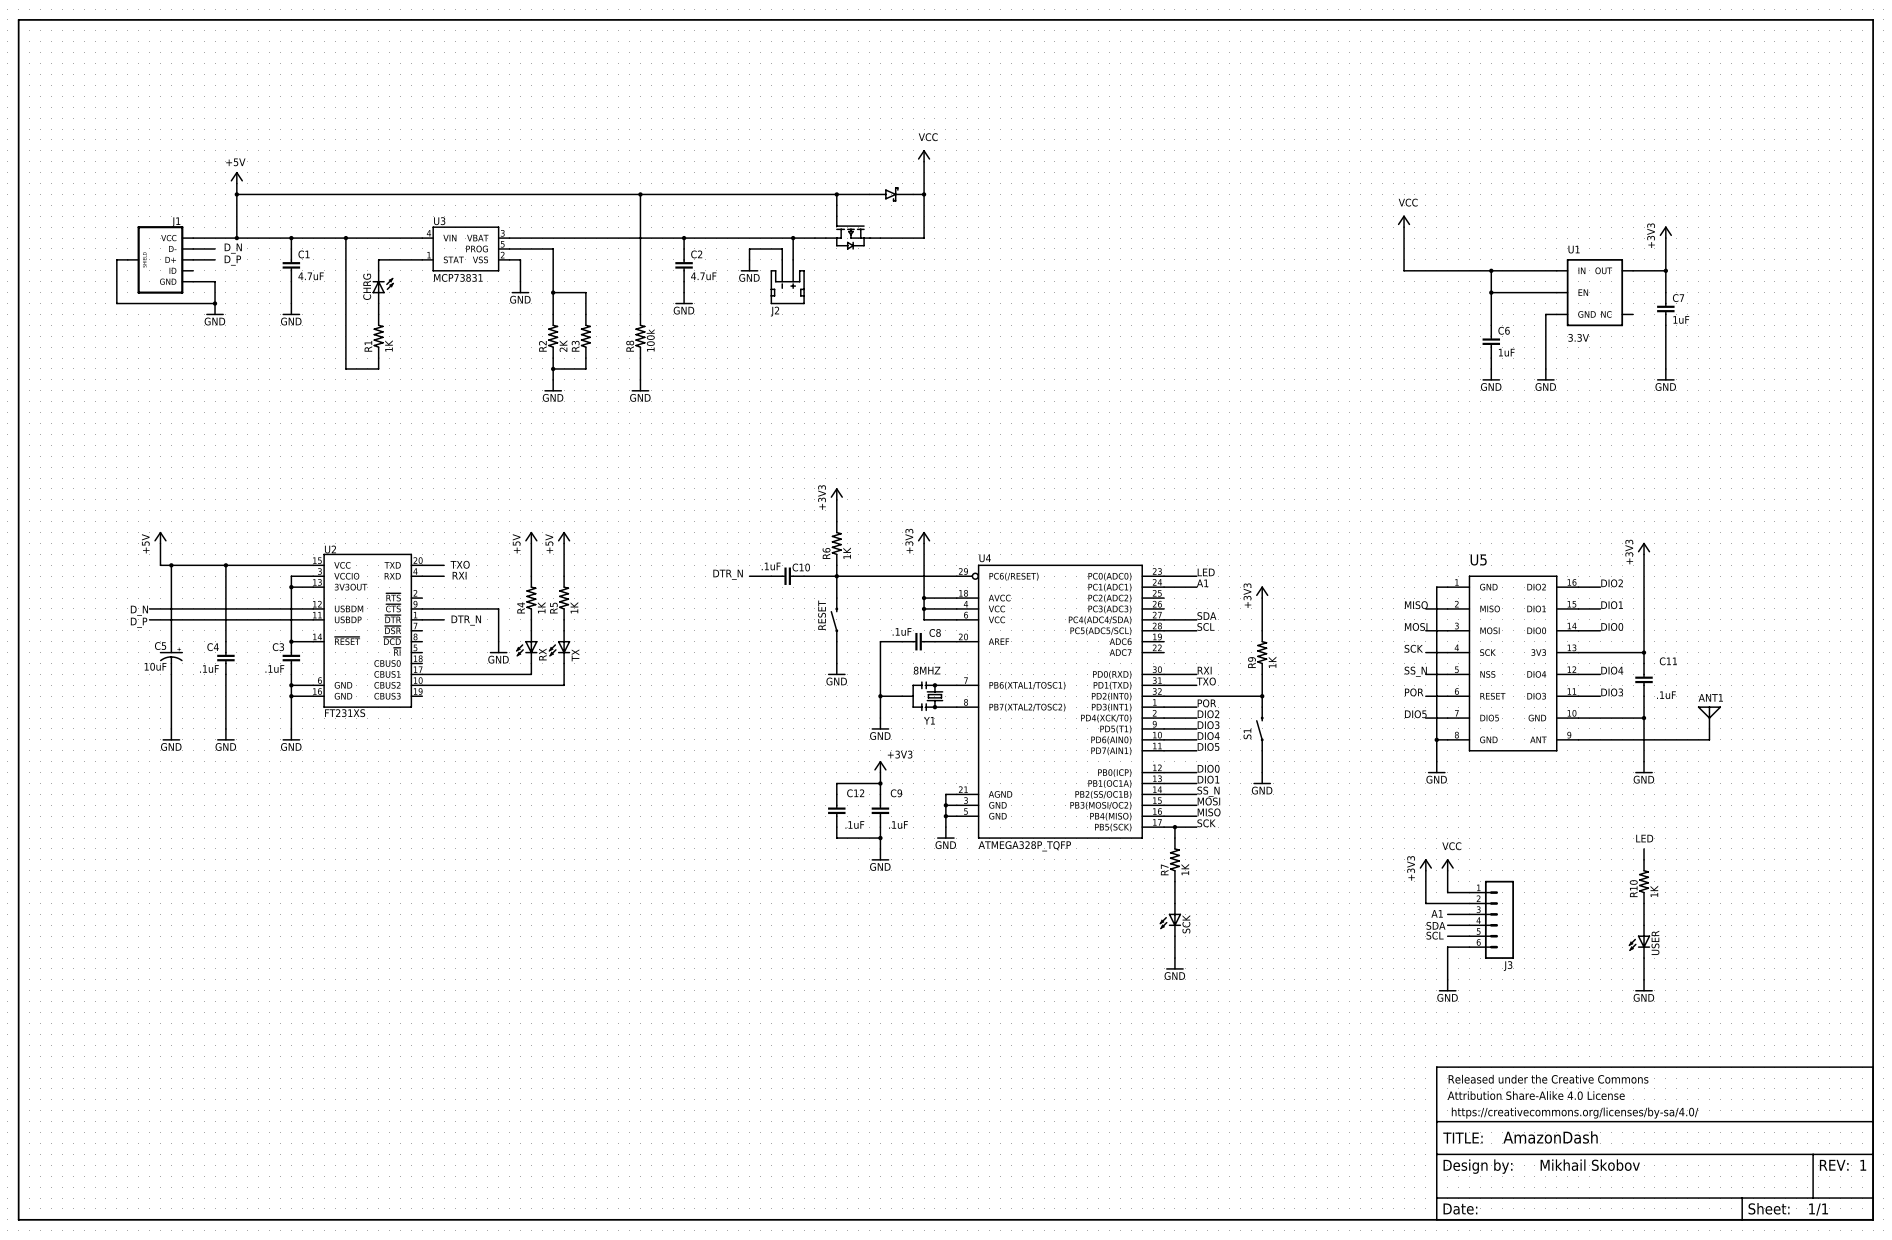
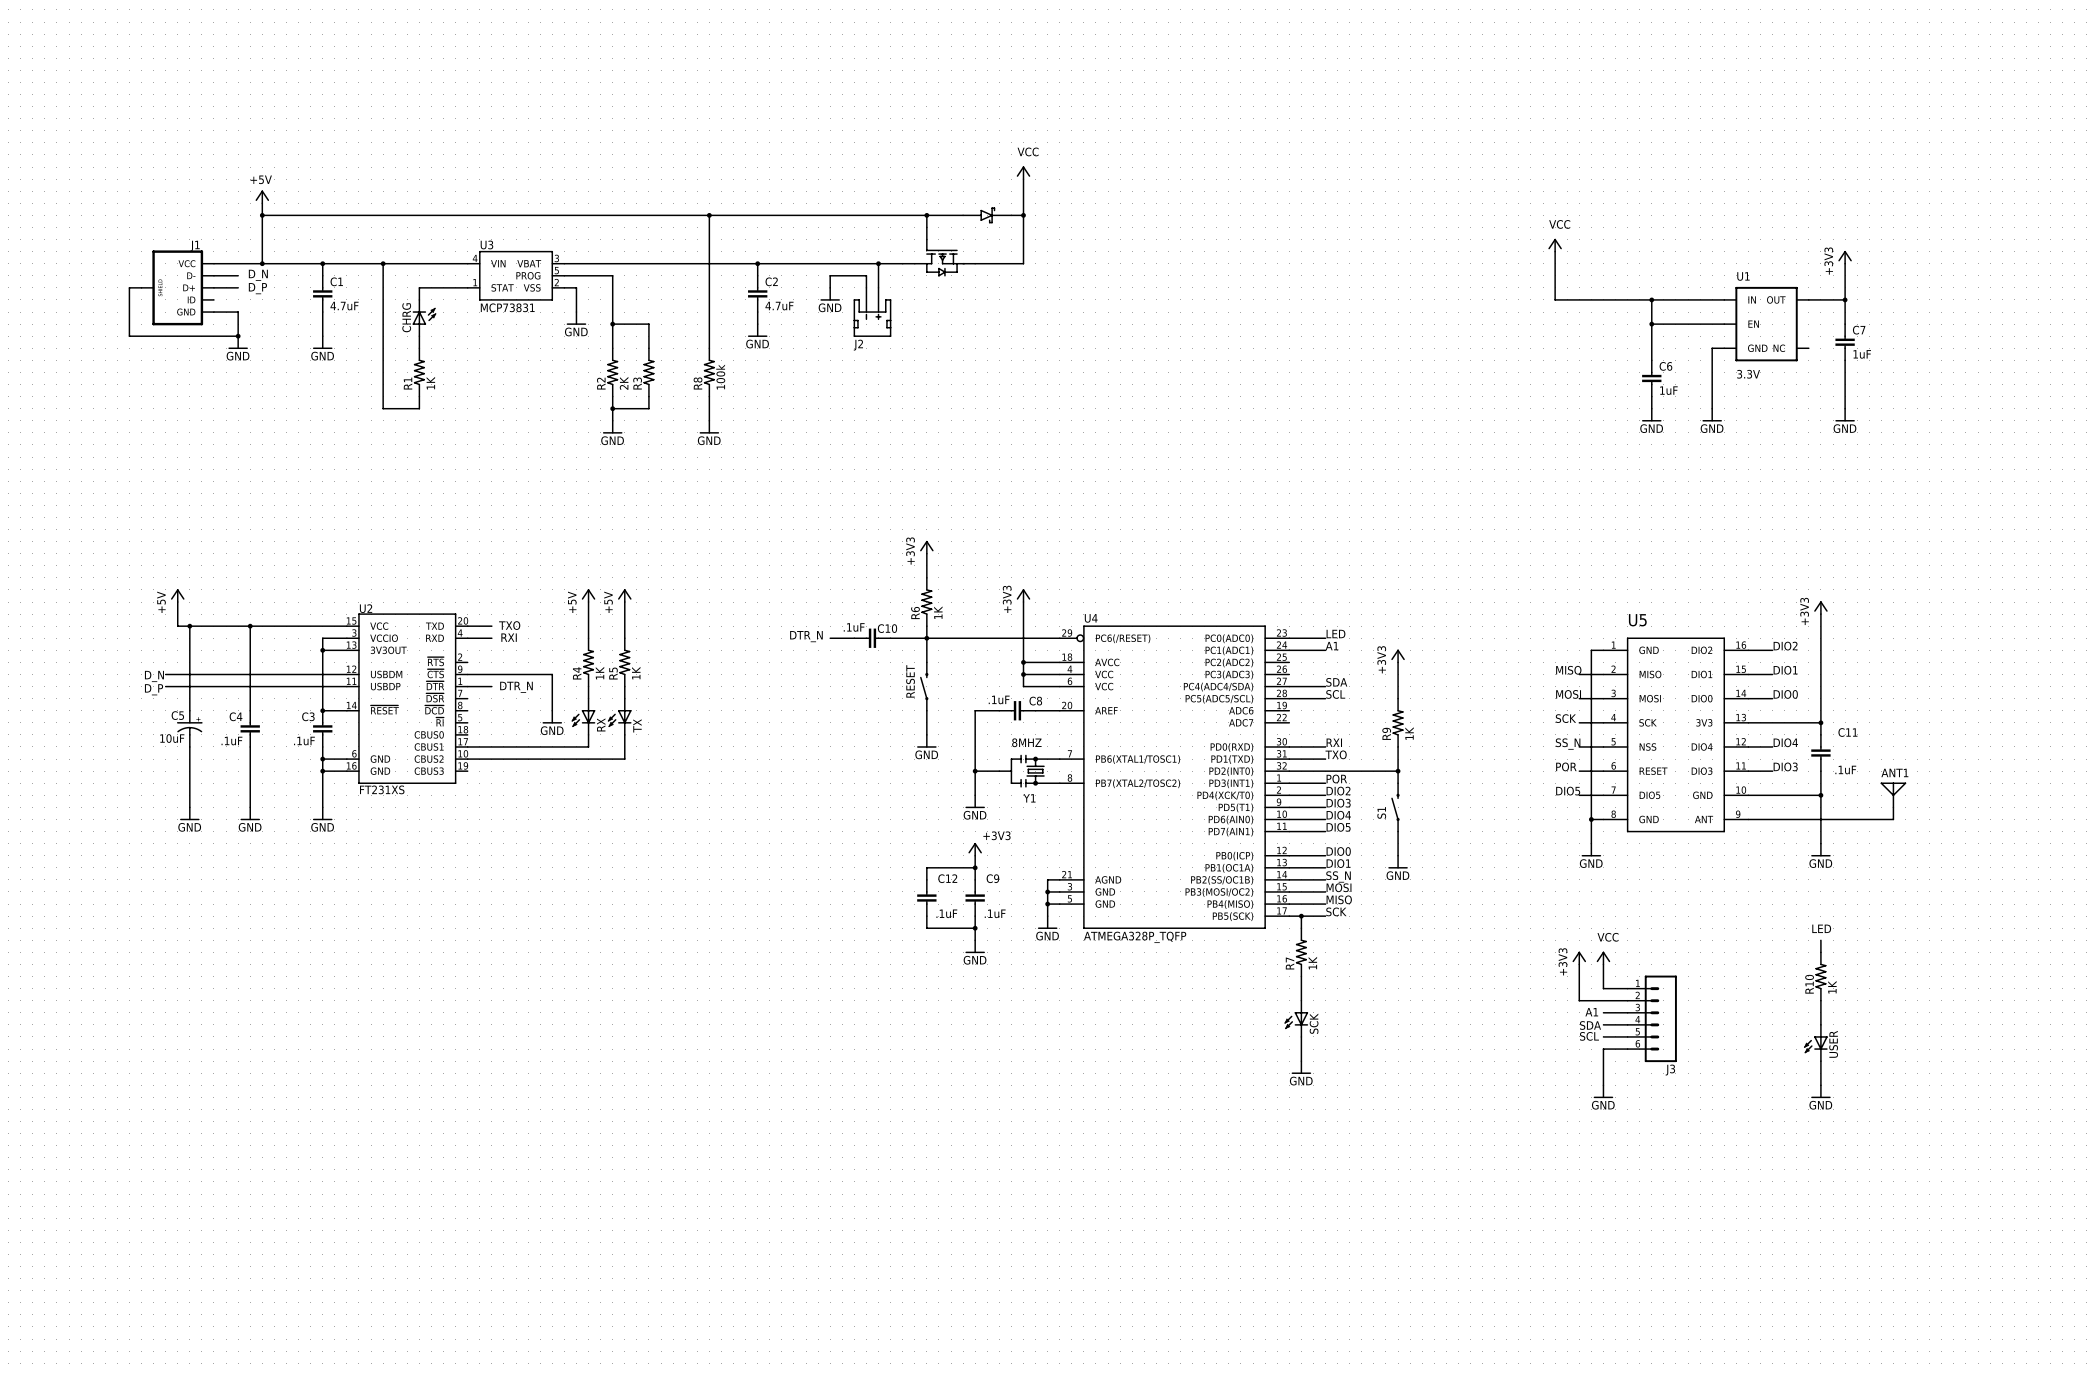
part: (945, 619) -> none
part: (1654, 1143) -> none
text: Mikhail Skobov (1590, 1165) -> none
text: 1 (1863, 1165) -> none

